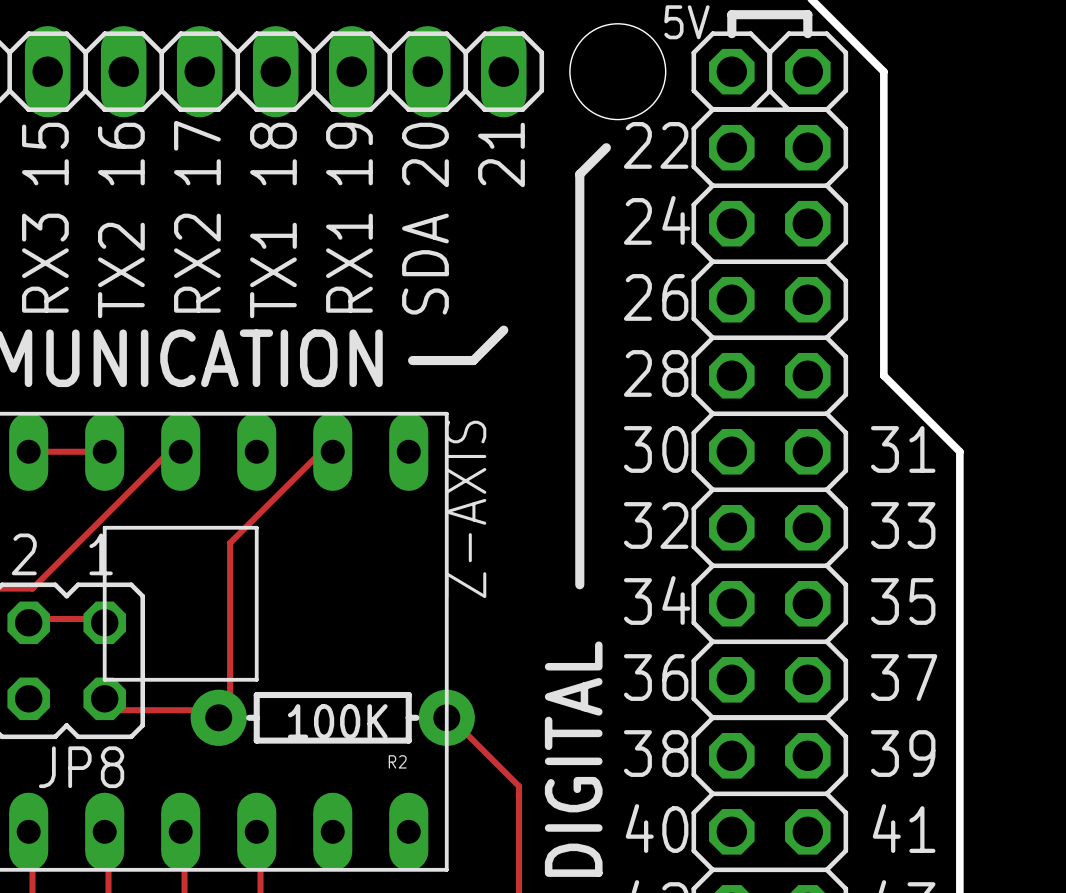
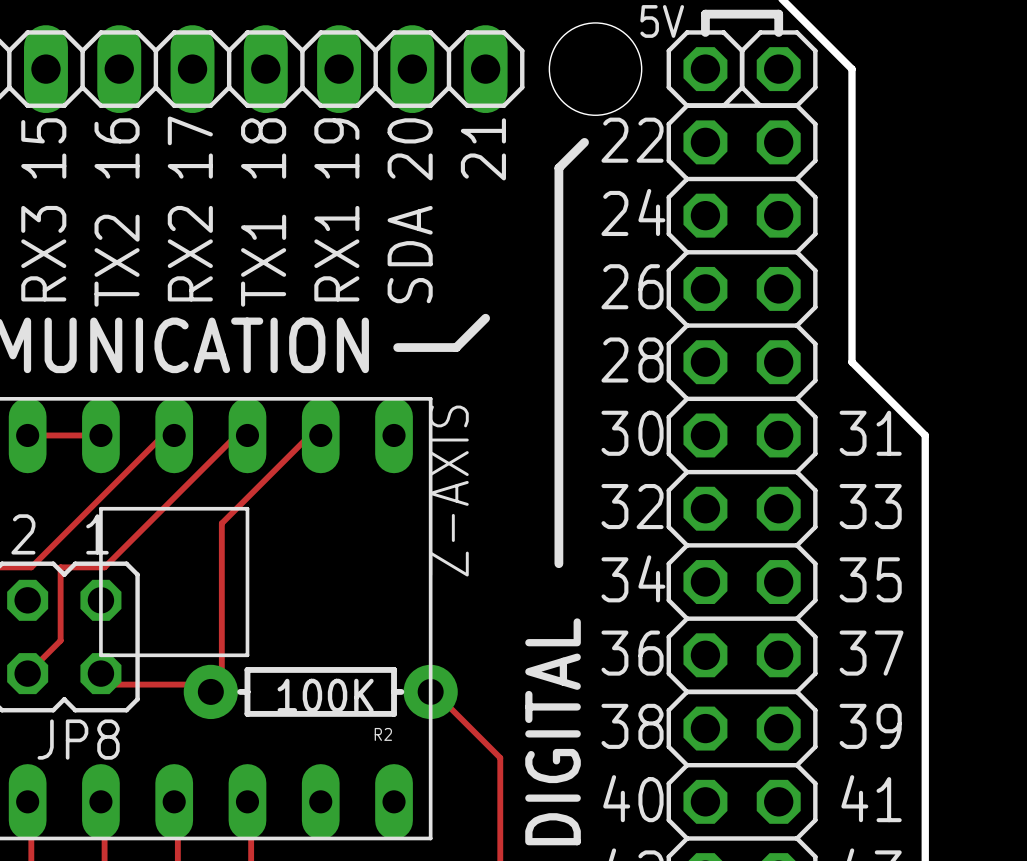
track: none -> (247, 435) (236, 435) (104, 567) (60, 567) (60, 640) (27, 673)
track: (28, 622) (32, 618) (93, 618) (104, 622) -> none

